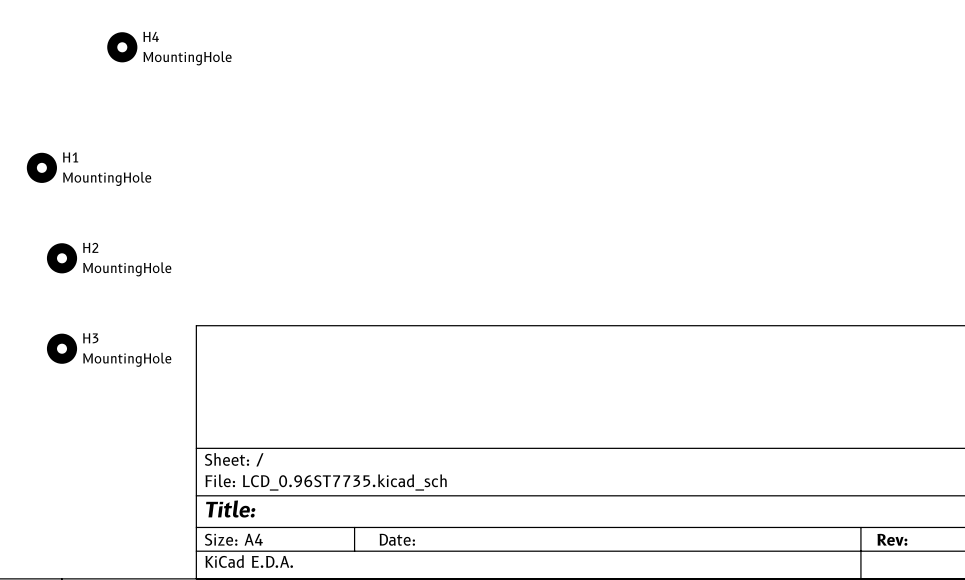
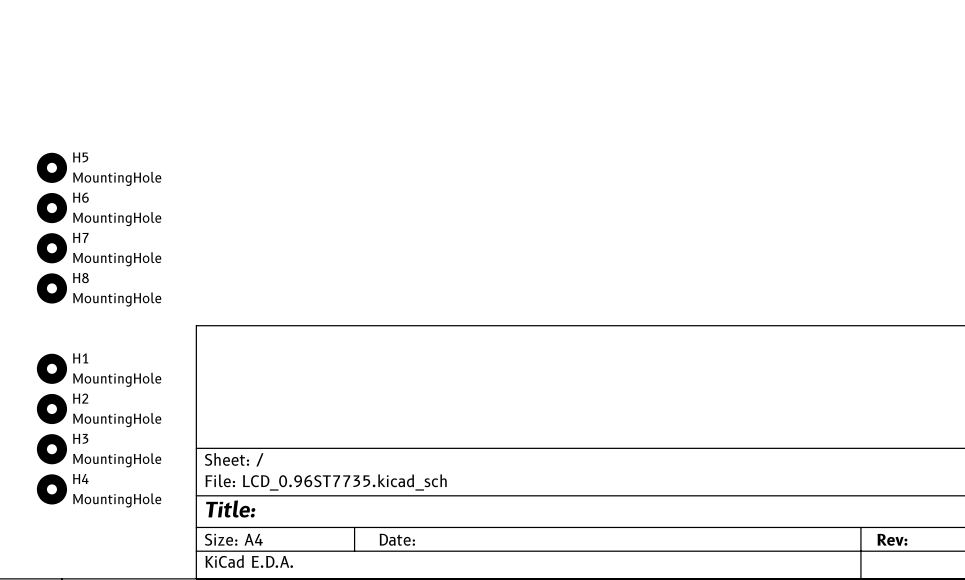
H4 position: (122, 47) -> (51, 489)
H1 position: (41, 167) -> (51, 368)
H5: none -> MountingHole (51, 167)
H6: none -> MountingHole (51, 208)
H7: none -> MountingHole (51, 248)
H2 position: (62, 258) -> (51, 409)
H8: none -> MountingHole (51, 288)
H3 position: (62, 348) -> (51, 449)

